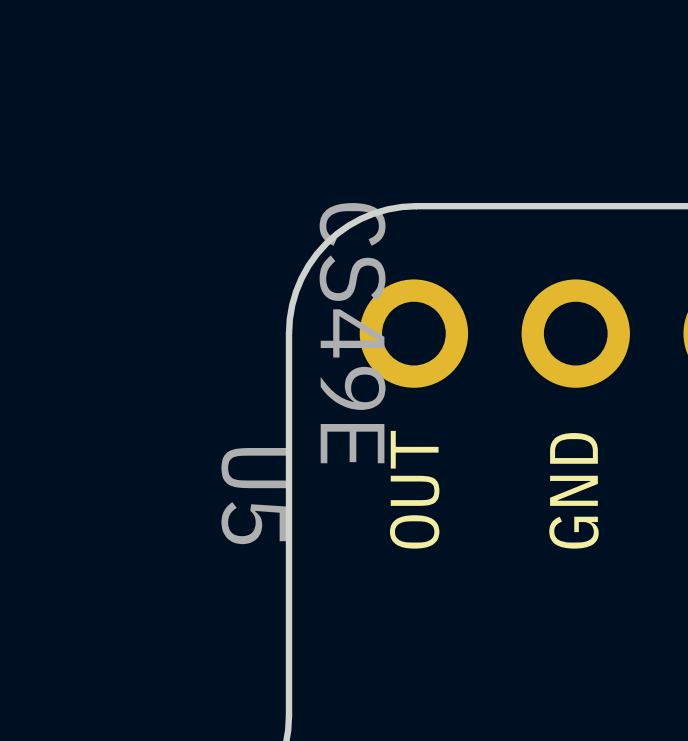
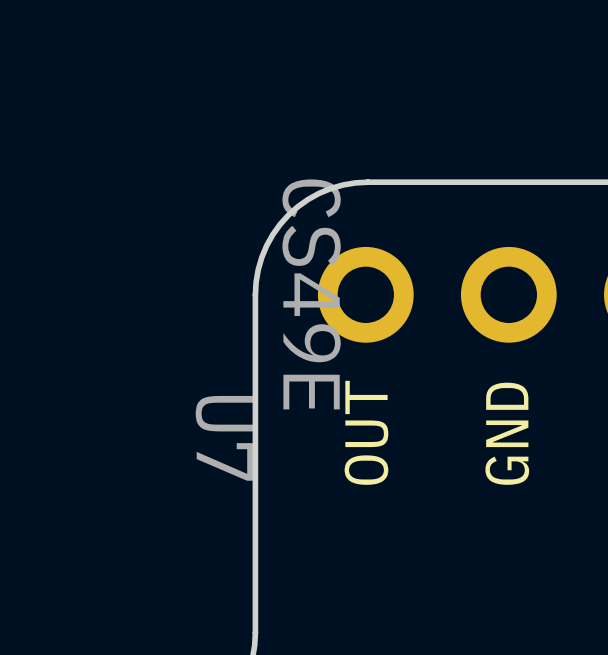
U5 name: U5 (253, 496) -> U7 (224, 438)

